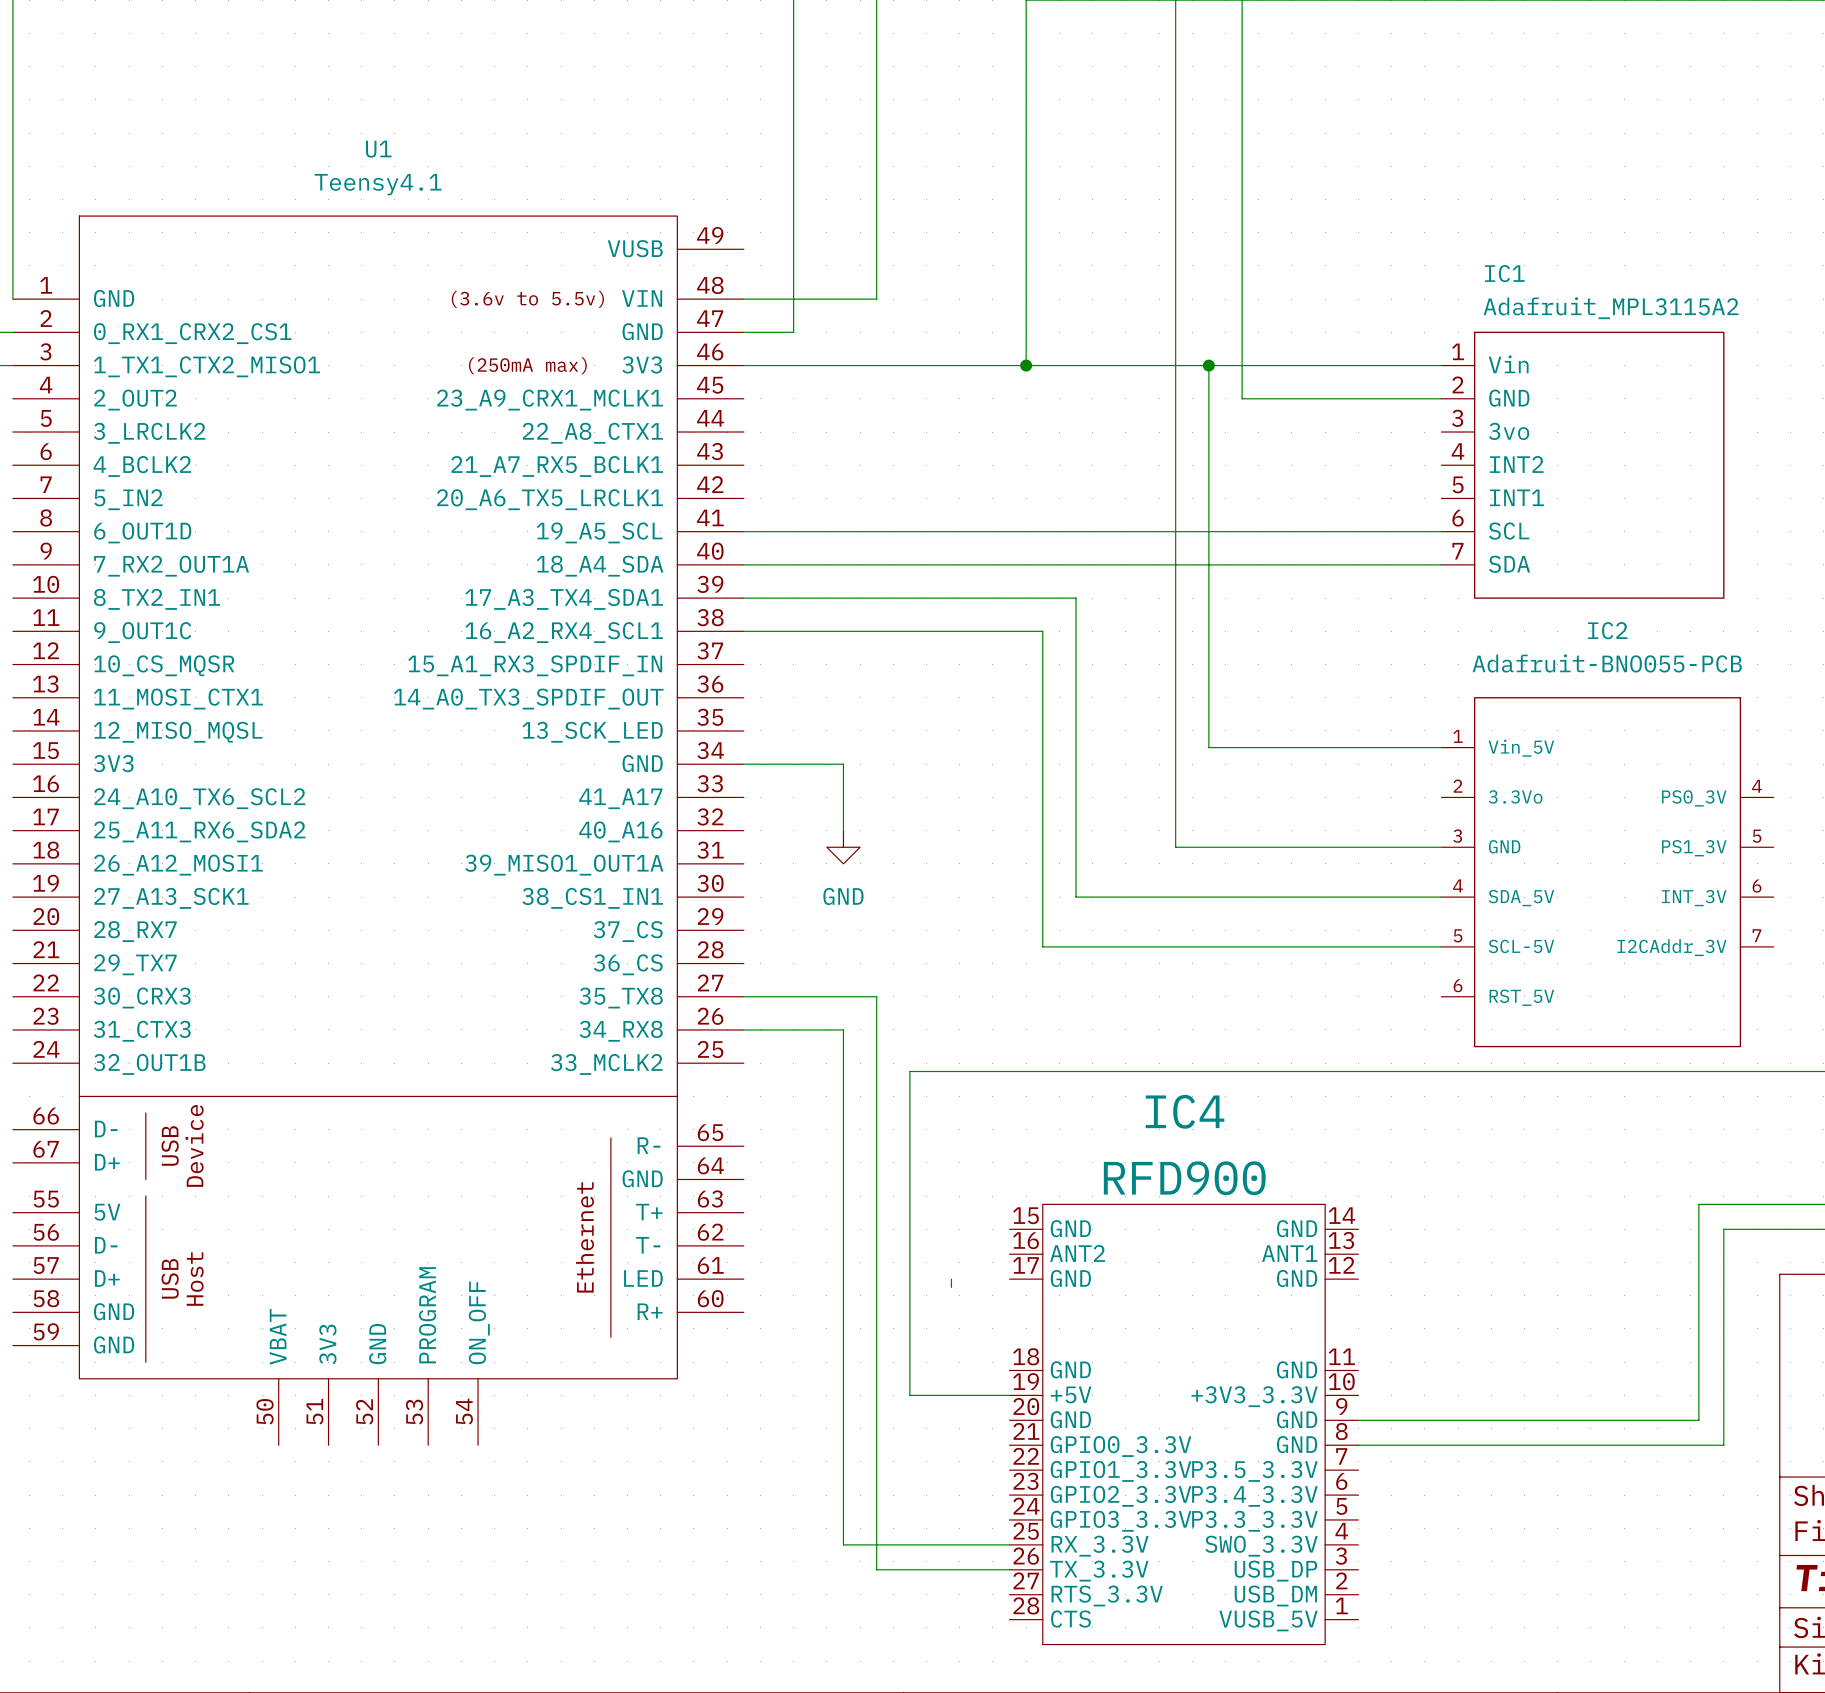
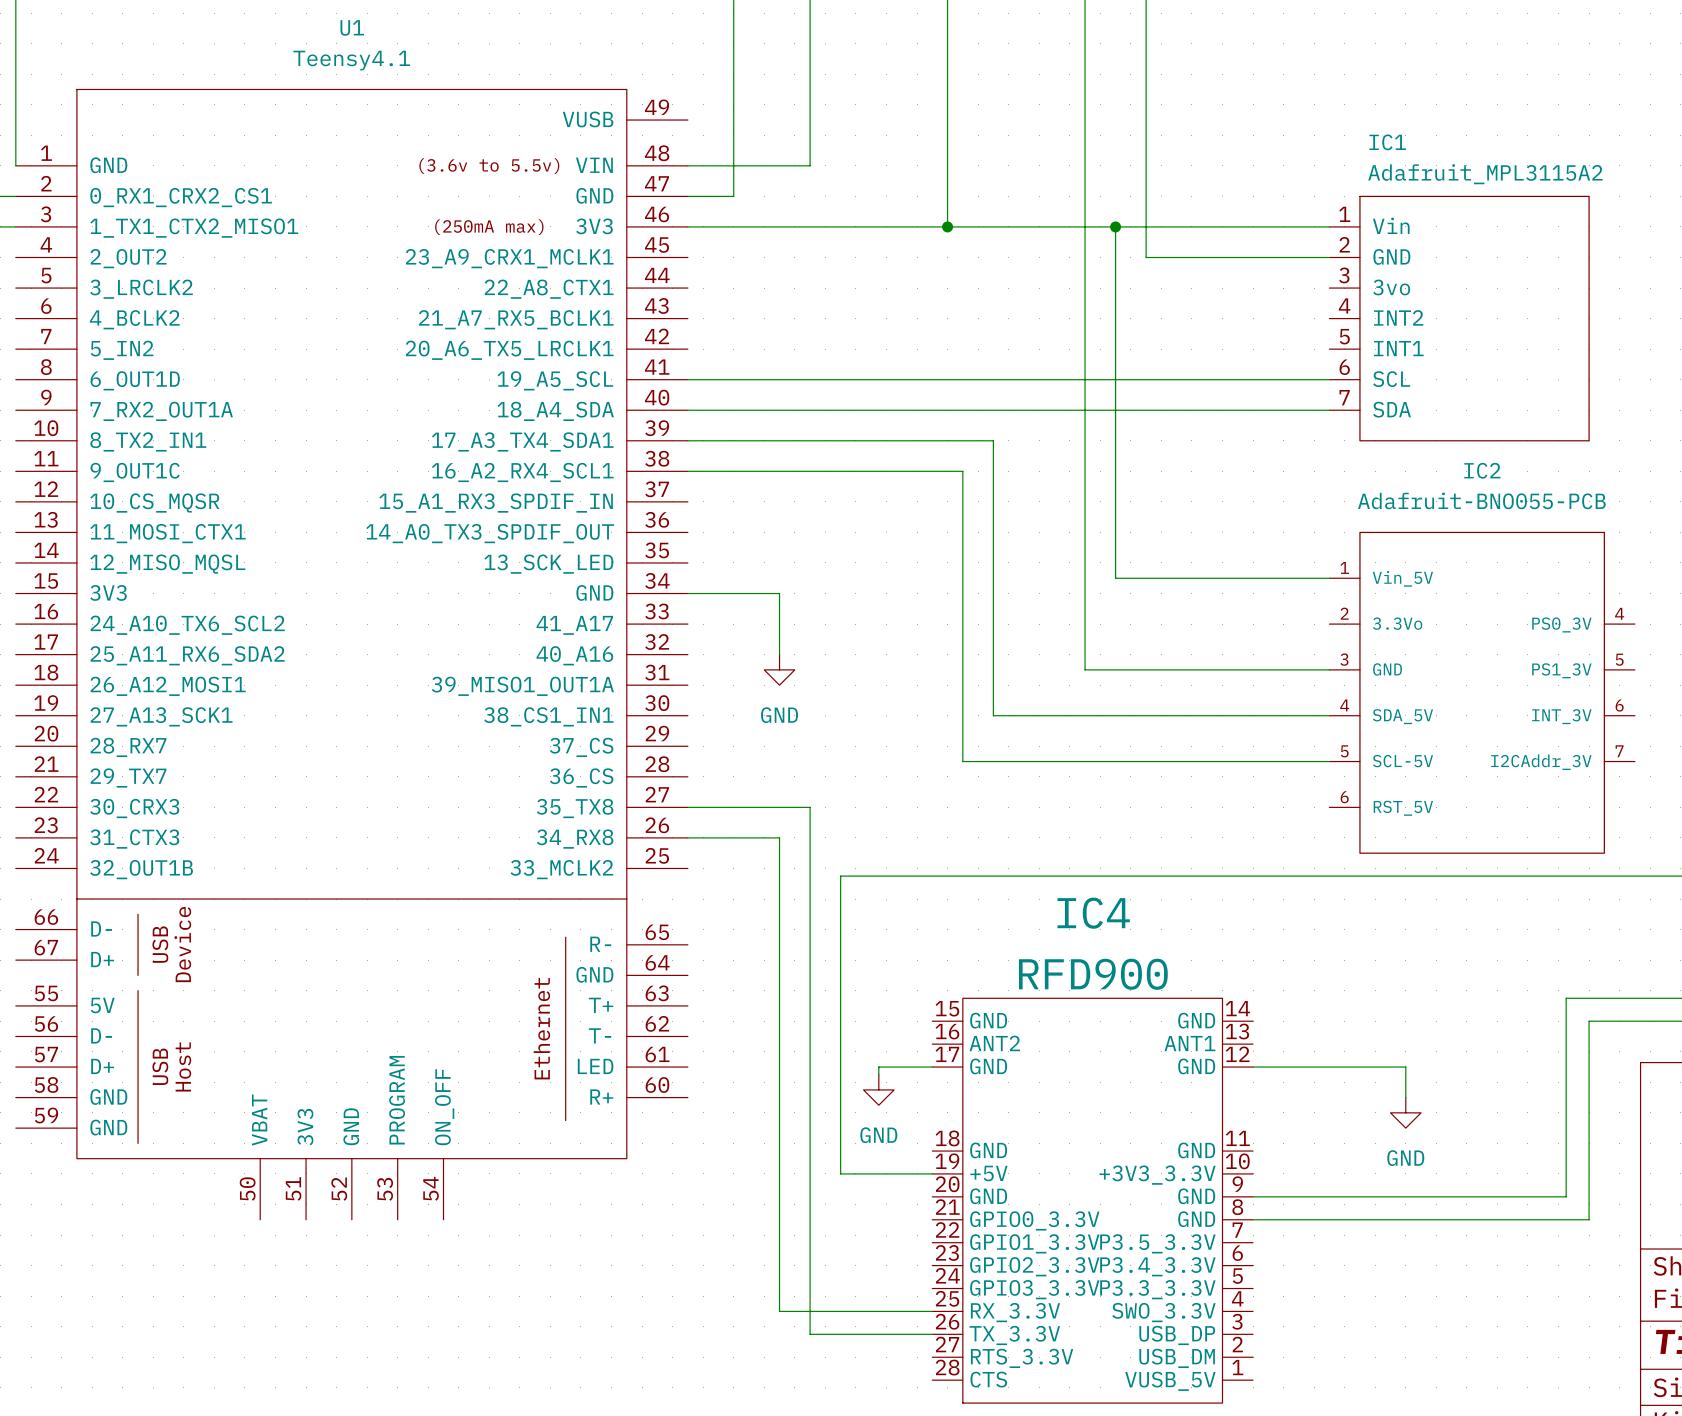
wire: none -> (878, 1067) (932, 1067)
wire: none -> (1253, 1067) (1405, 1067) (1405, 1097)
power symbol: none -> GND (878, 1089)
power symbol: none -> GND (1405, 1112)

